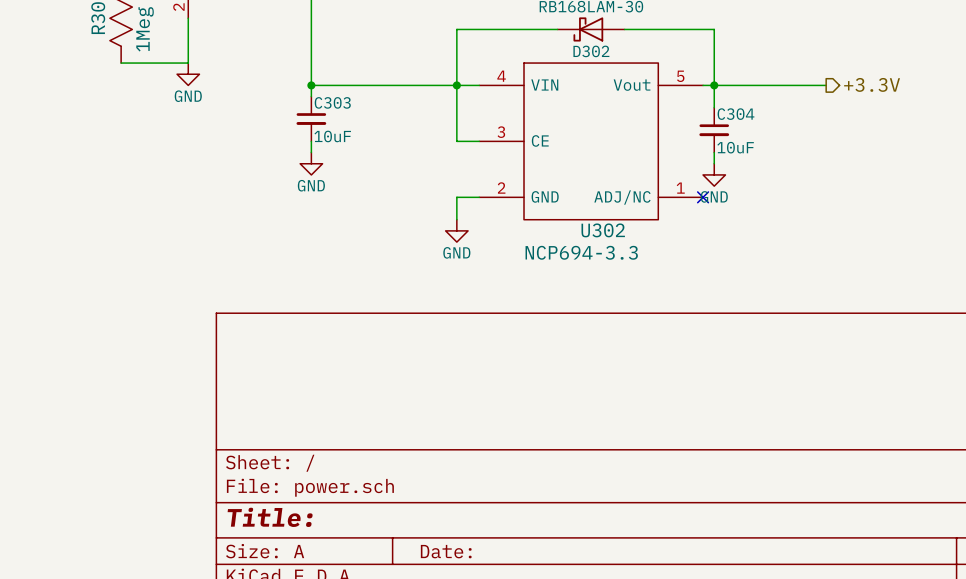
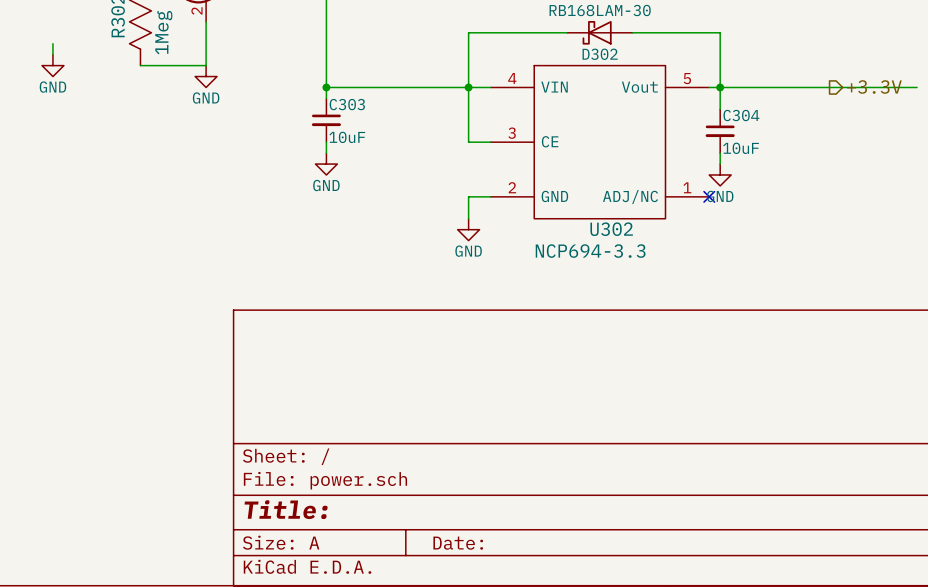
wire: none -> (52, 43) (52, 54)
power symbol: none -> GND (52, 65)
wire: none -> (829, 87) (917, 87)

